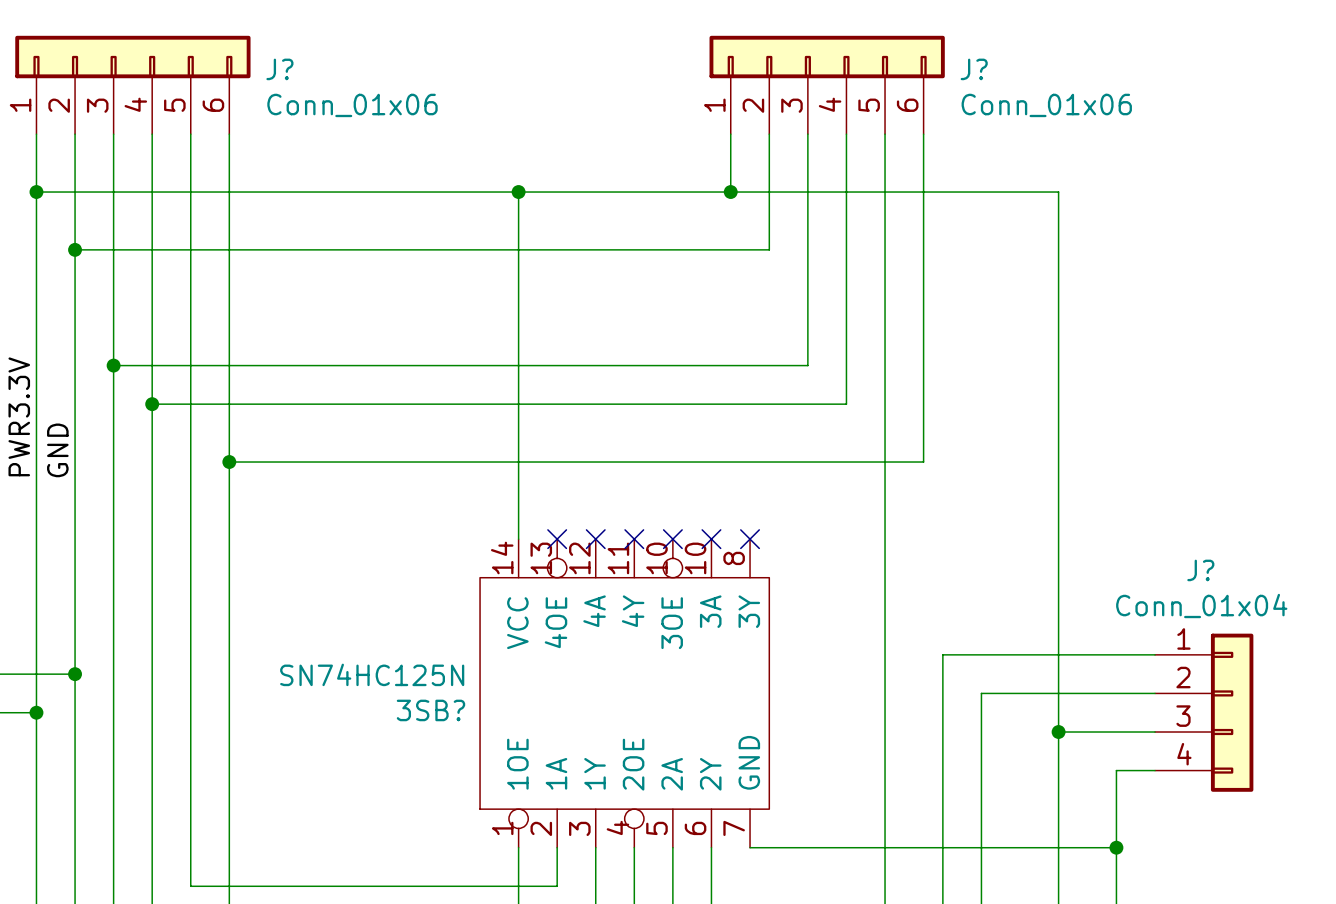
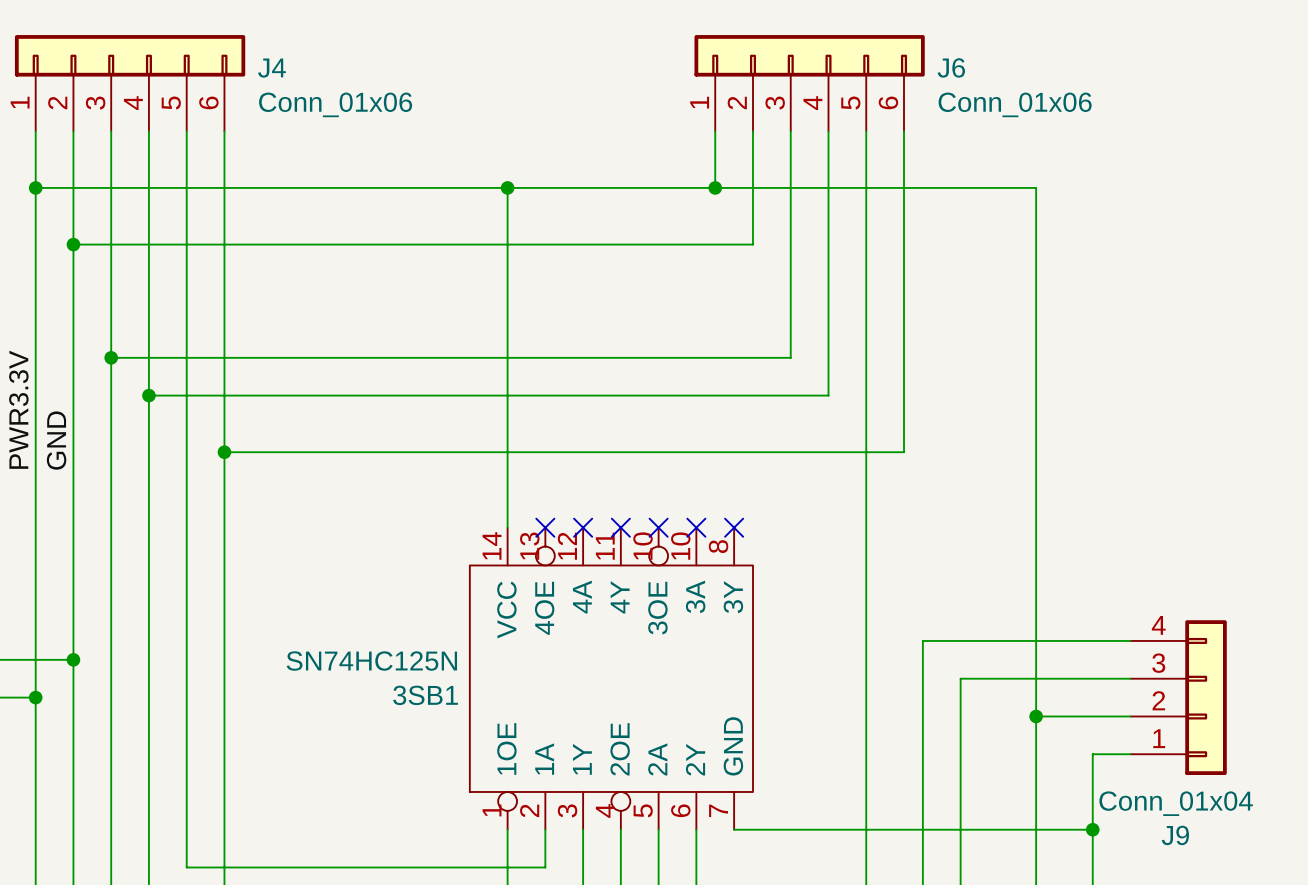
J? name: J? (279, 69) -> J4 (271, 68)
J? name: J? (974, 69) -> J6 (951, 67)
J? name: J? (1200, 570) -> J9 (1175, 835)
3SB? name: 3SB? (430, 710) -> 3SB1 (425, 695)
J? flip: as is (1232, 712) -> up-down (1206, 697)

